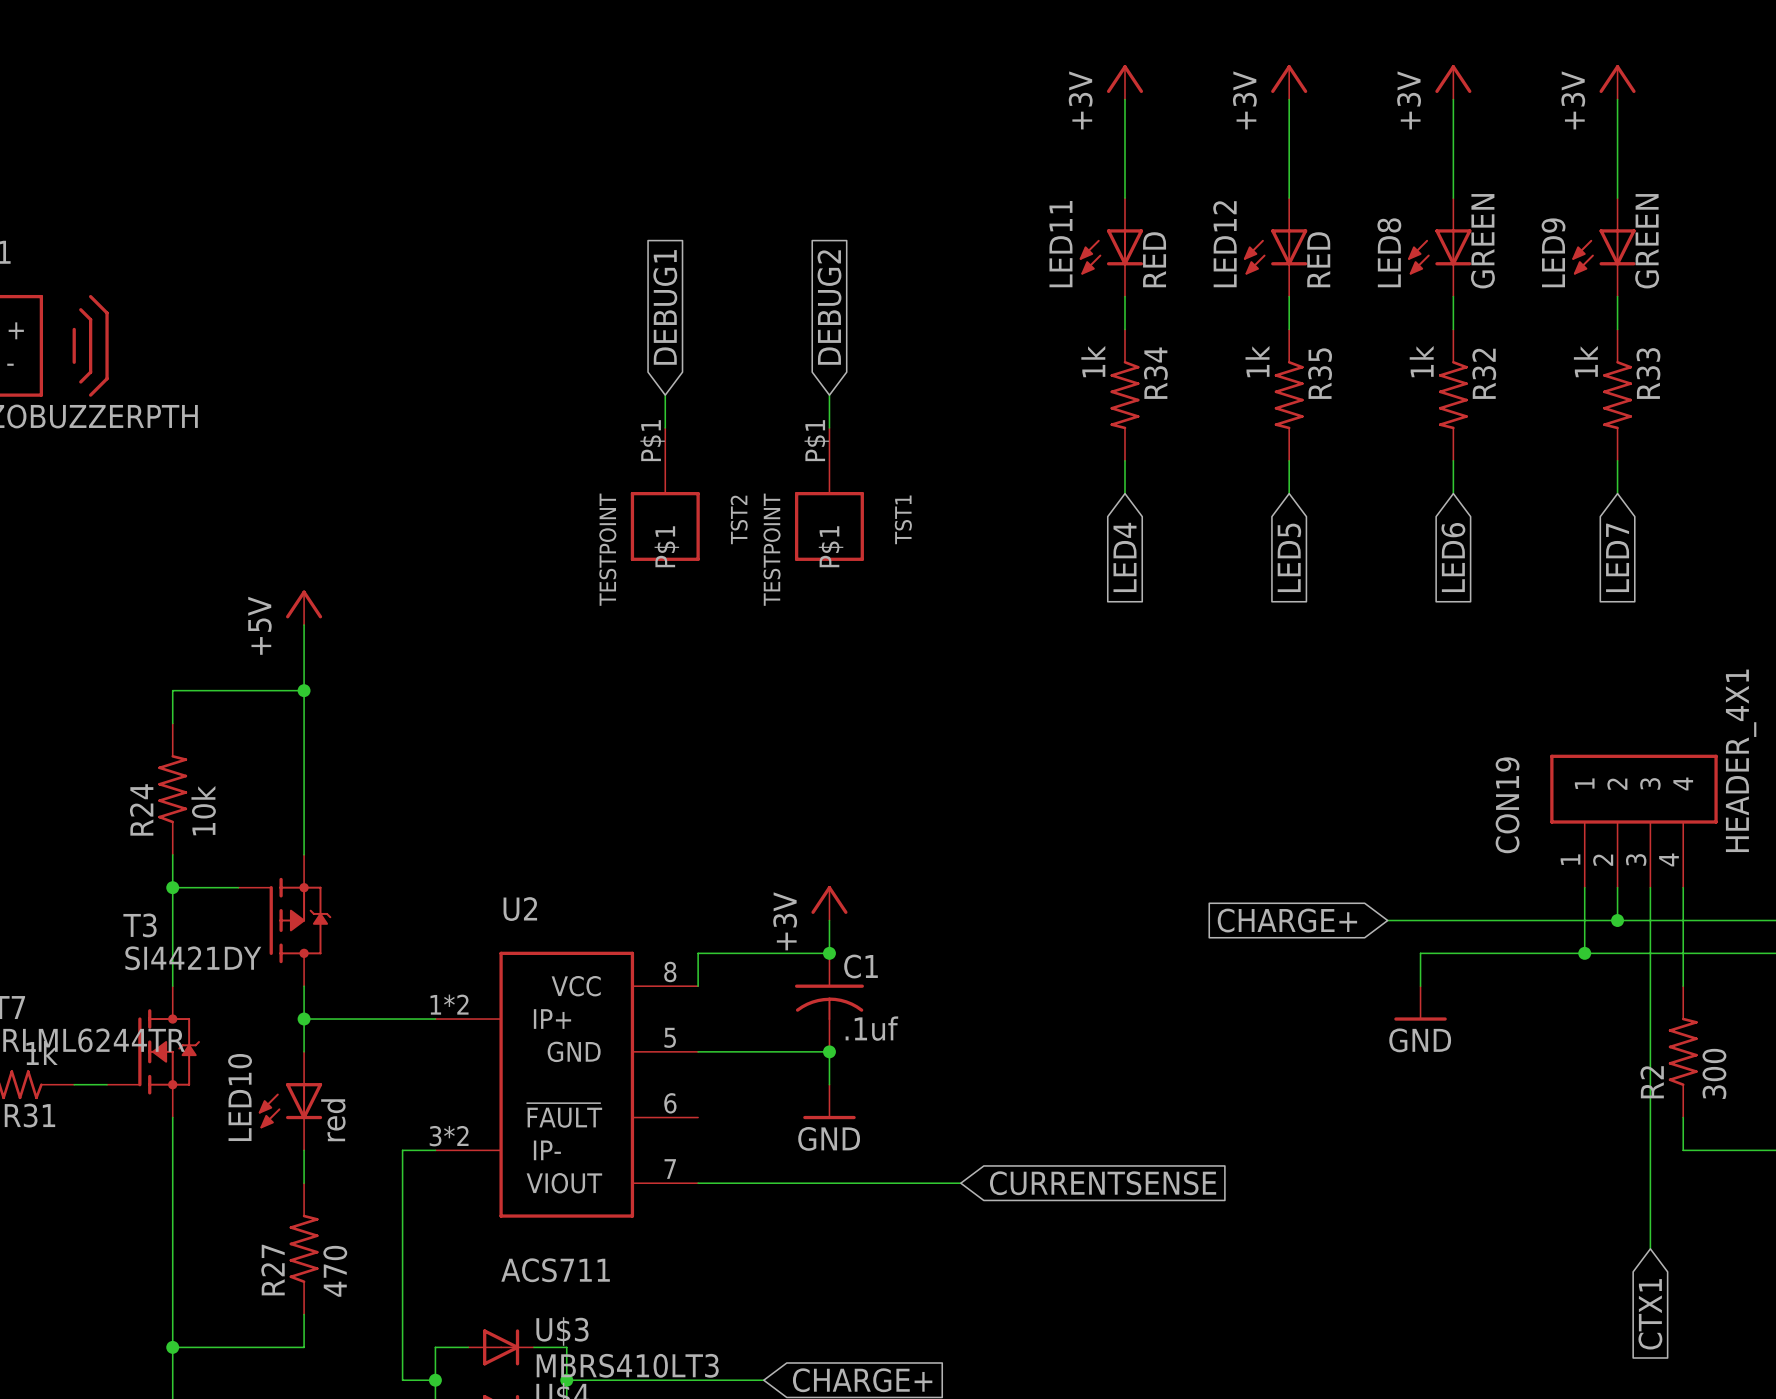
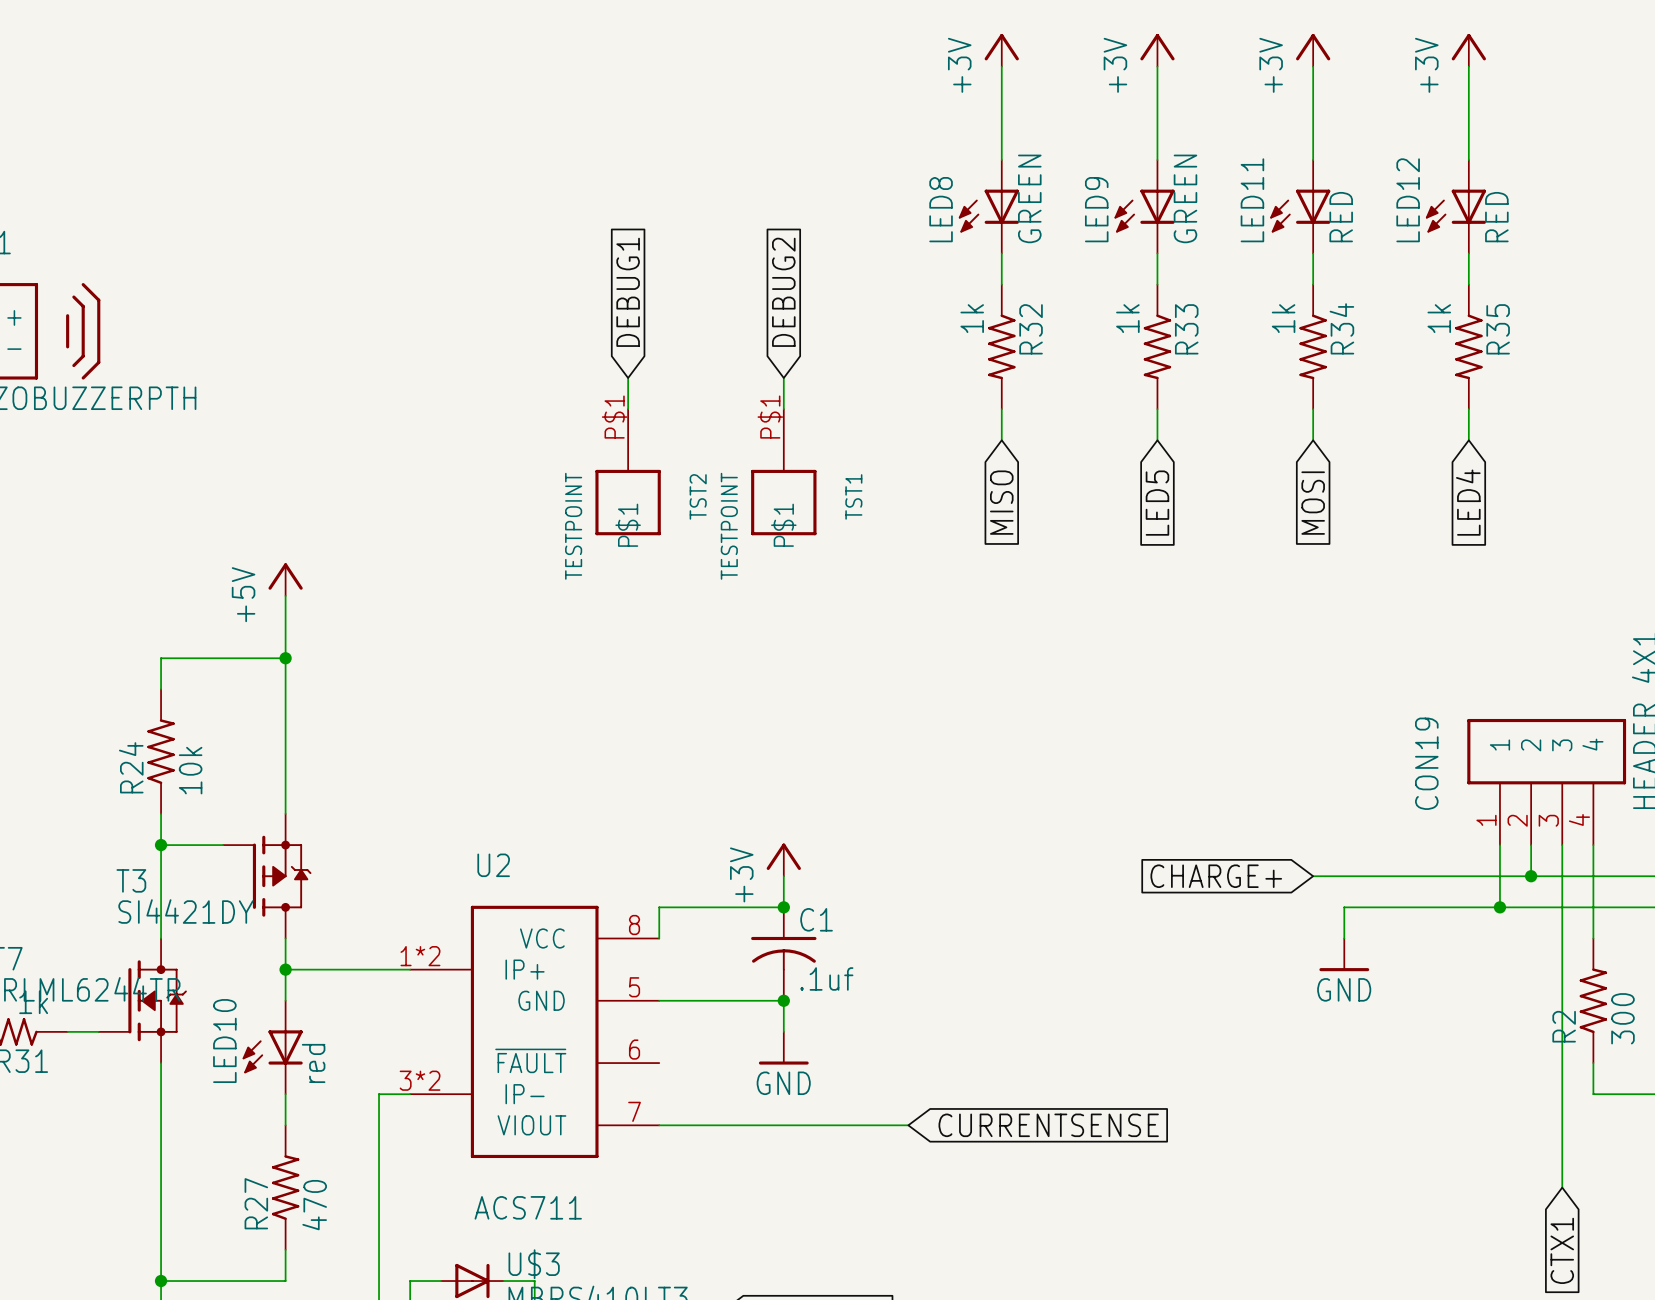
power symbol: none -> +3V (1001, 50)
power symbol: none -> +3V (1157, 50)
power symbol: none -> +3V (1313, 50)
power symbol: none -> +3V (1468, 50)
power symbol: +3V (1125, 82) -> none
power symbol: +3V (1289, 82) -> none
power symbol: +3V (1453, 82) -> none
power symbol: +3V (1617, 82) -> none
wire: (1125, 99) (1125, 198) -> (1001, 66) (1001, 160)
wire: (1289, 99) (1289, 198) -> (1157, 66) (1157, 160)
wire: (1453, 99) (1453, 198) -> (1313, 66) (1313, 160)
wire: (1617, 99) (1617, 198) -> (1468, 66) (1468, 160)
LED11 position: (1111, 247) -> (1300, 206)
LED12 position: (1275, 247) -> (1455, 206)
LED8 position: (1439, 247) -> (988, 206)
LED9 position: (1603, 247) -> (1144, 206)
wire: (1125, 296) (1125, 329) -> (1001, 253) (1001, 284)
wire: (1289, 296) (1289, 329) -> (1157, 253) (1157, 284)
wire: (1453, 296) (1453, 329) -> (1313, 253) (1313, 284)
wire: (1617, 296) (1617, 329) -> (1468, 253) (1468, 284)
R34 position: (1125, 395) -> (1313, 346)
R35 position: (1289, 395) -> (1468, 346)
R32 position: (1453, 395) -> (1001, 346)
R33 position: (1617, 395) -> (1157, 346)
wire: (1125, 460) (1125, 493) -> (1001, 409) (1001, 440)
wire: (1289, 460) (1289, 493) -> (1157, 409) (1157, 440)
wire: (1453, 460) (1453, 493) -> (1313, 409) (1313, 440)
wire: (1617, 460) (1617, 493) -> (1468, 409) (1468, 440)
global label: none -> MISO (1001, 502)
global label: none -> MOSI (1313, 503)
global label: none -> LED4 (1468, 502)
global label: LED4 (1125, 557) -> none
global label position: LED5 (1289, 557) -> LED5 (1157, 503)
global label: LED6 (1453, 557) -> none
global label: LED7 (1617, 557) -> none

